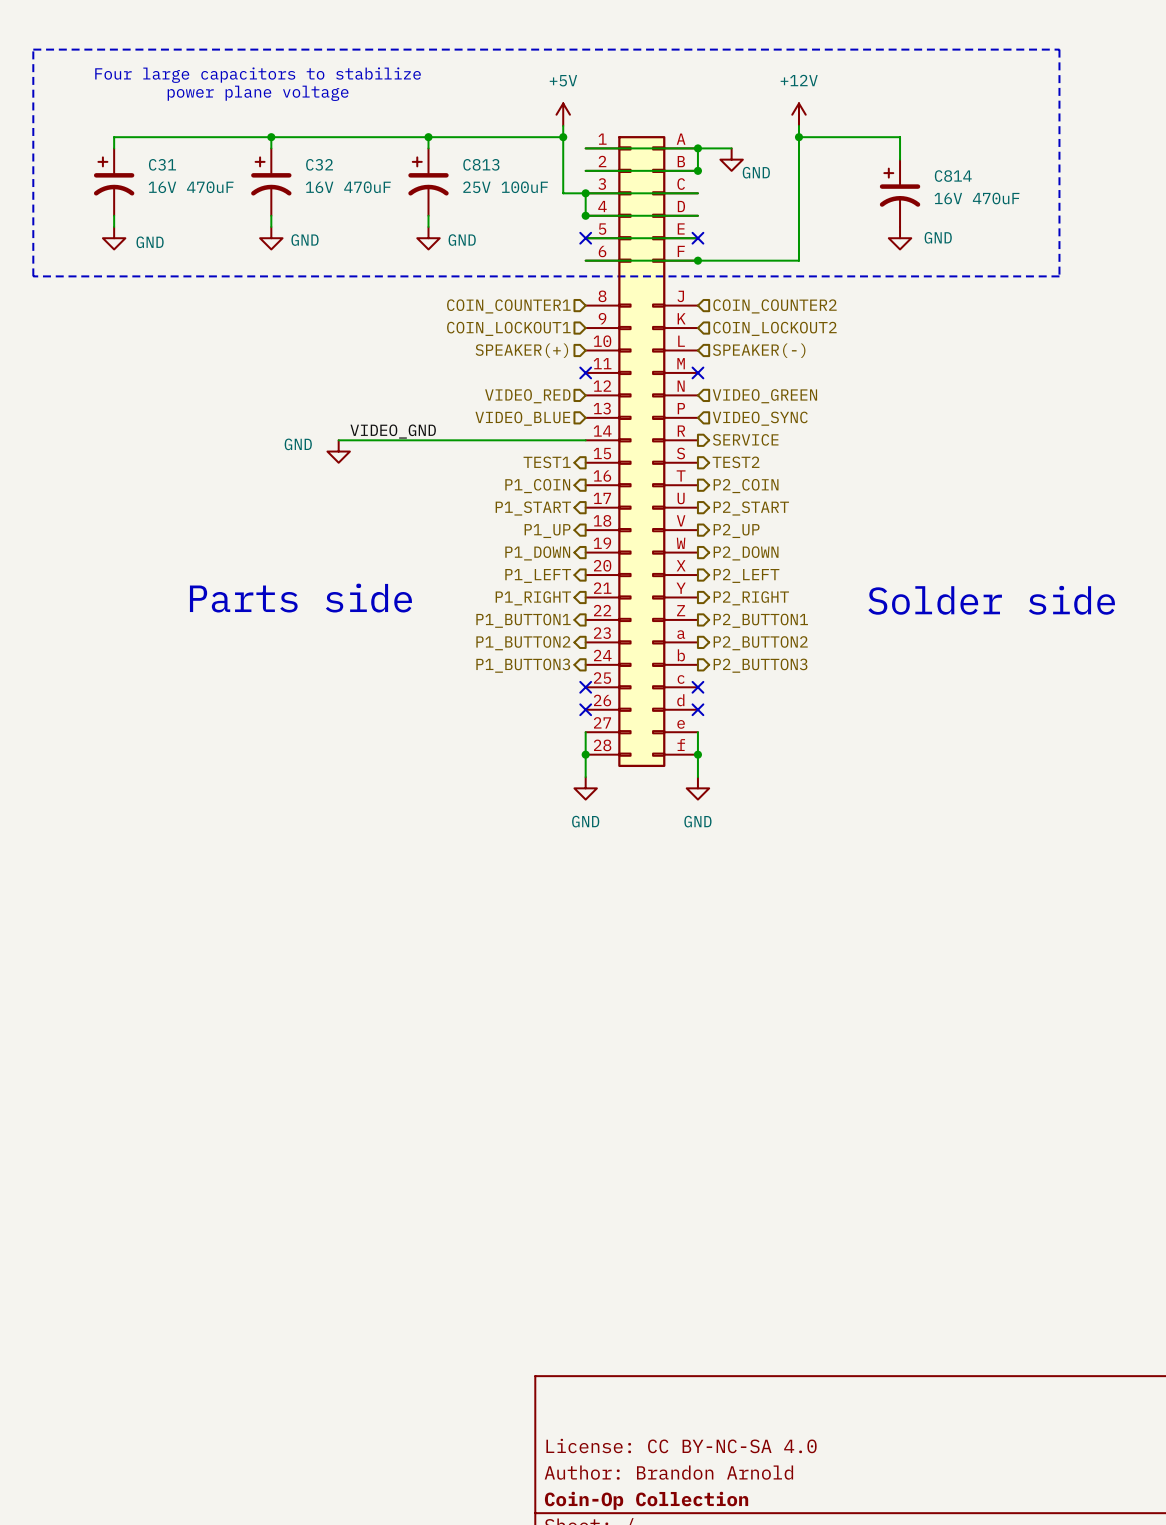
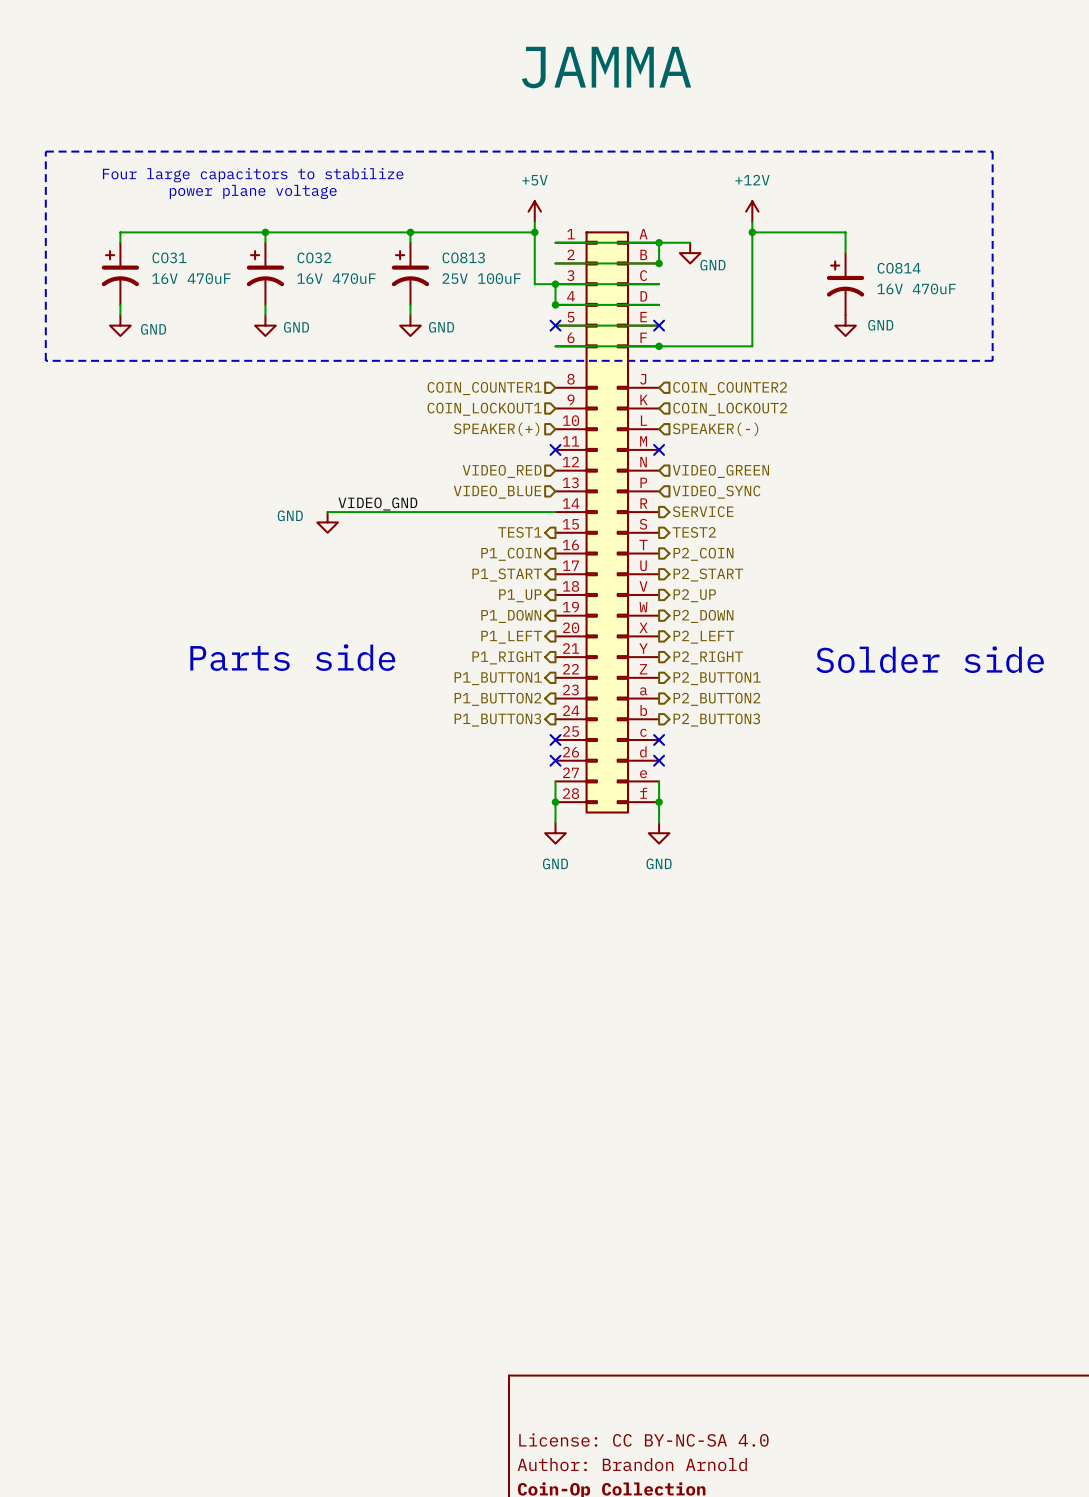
C31 name: C31 (162, 164) -> CO31 (169, 257)
C32 name: C32 (319, 164) -> CO32 (314, 257)
C813 name: C813 (481, 164) -> CO813 (463, 257)
C814 name: C814 (953, 176) -> CO814 (899, 268)

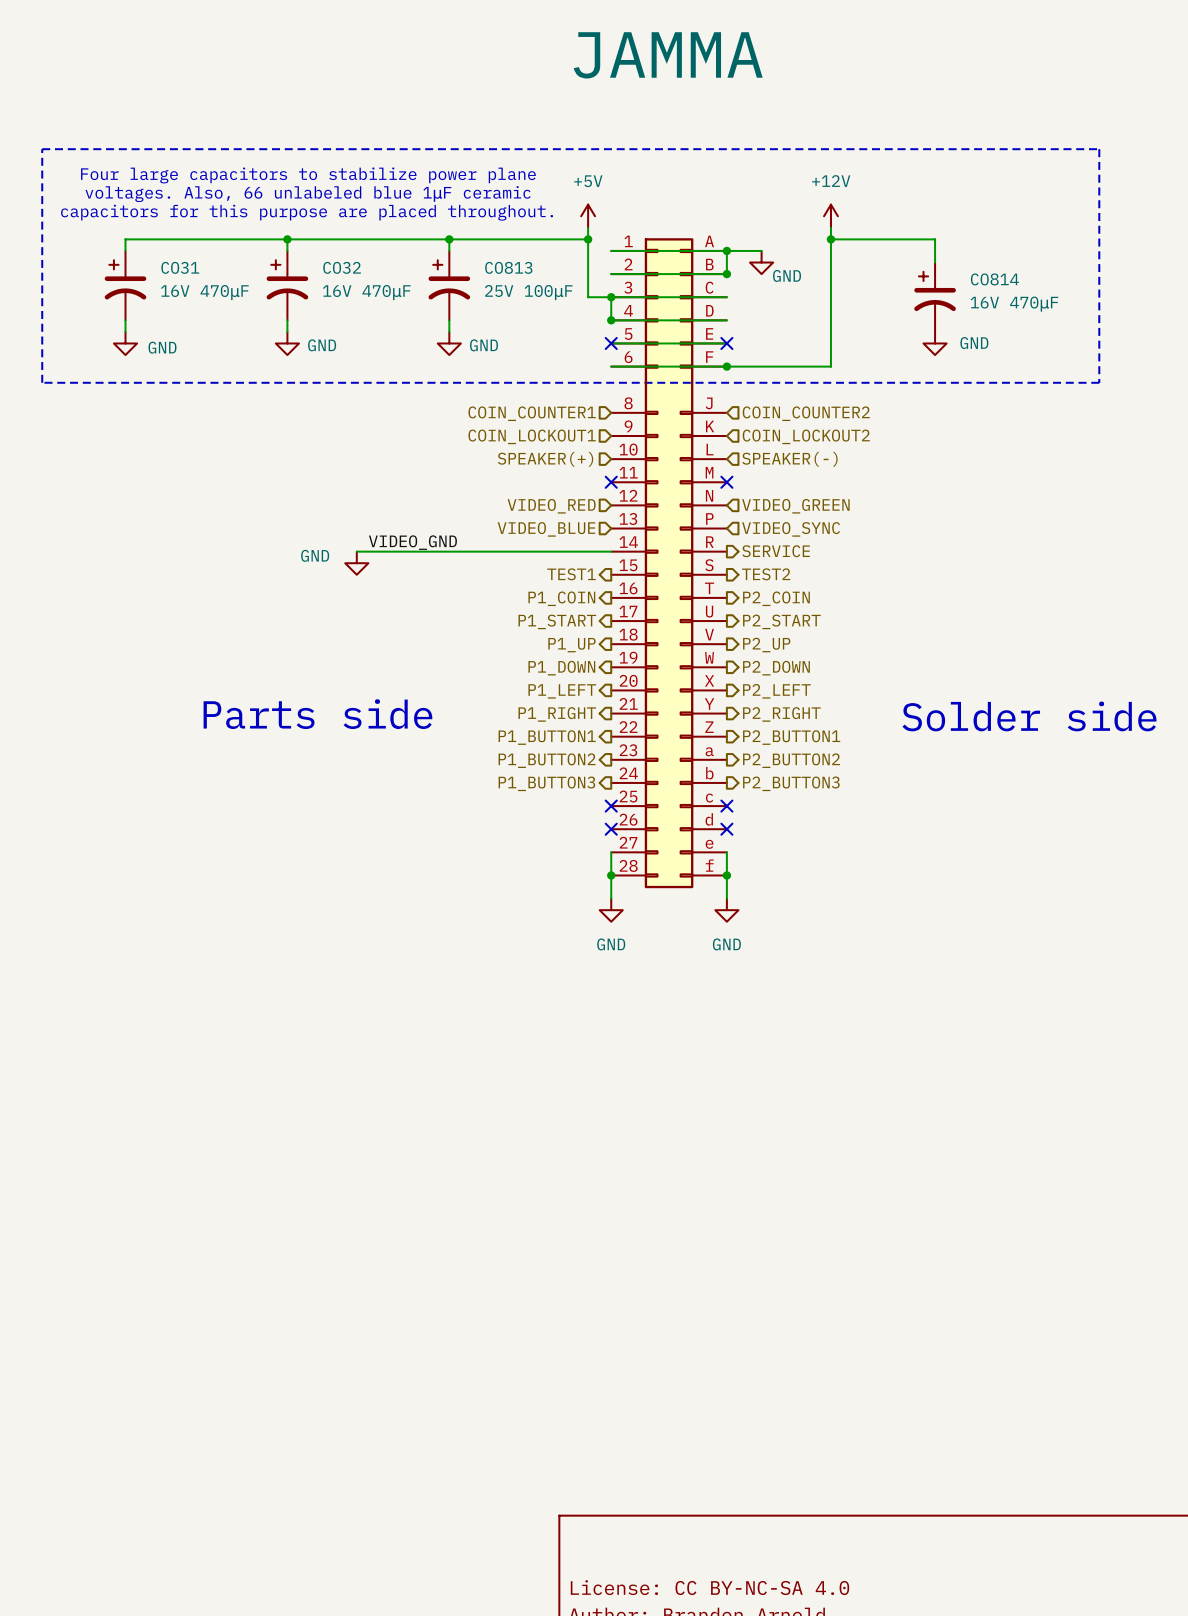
text: Four large capacitors to stabilize (253, 175) -> Four large capacitors to stabilize power plane (308, 175)
text: power plane voltage (253, 191) -> none
text: none -> voltages. Also, 66 unlabeled blue 1μF ceramic (308, 194)
text: none -> capacitors for this purpose are placed throughout. (307, 212)
CO31 value: 16V 470uF (191, 278) -> 16V 470μF (204, 292)
CO32 value: 16V 470uF (336, 278) -> 16V 470μF (366, 292)
CO813 value: 25V 100uF (481, 278) -> 25V 100μF (528, 292)
CO814 value: 16V 470uF (916, 288) -> 16V 470μF (1014, 304)

